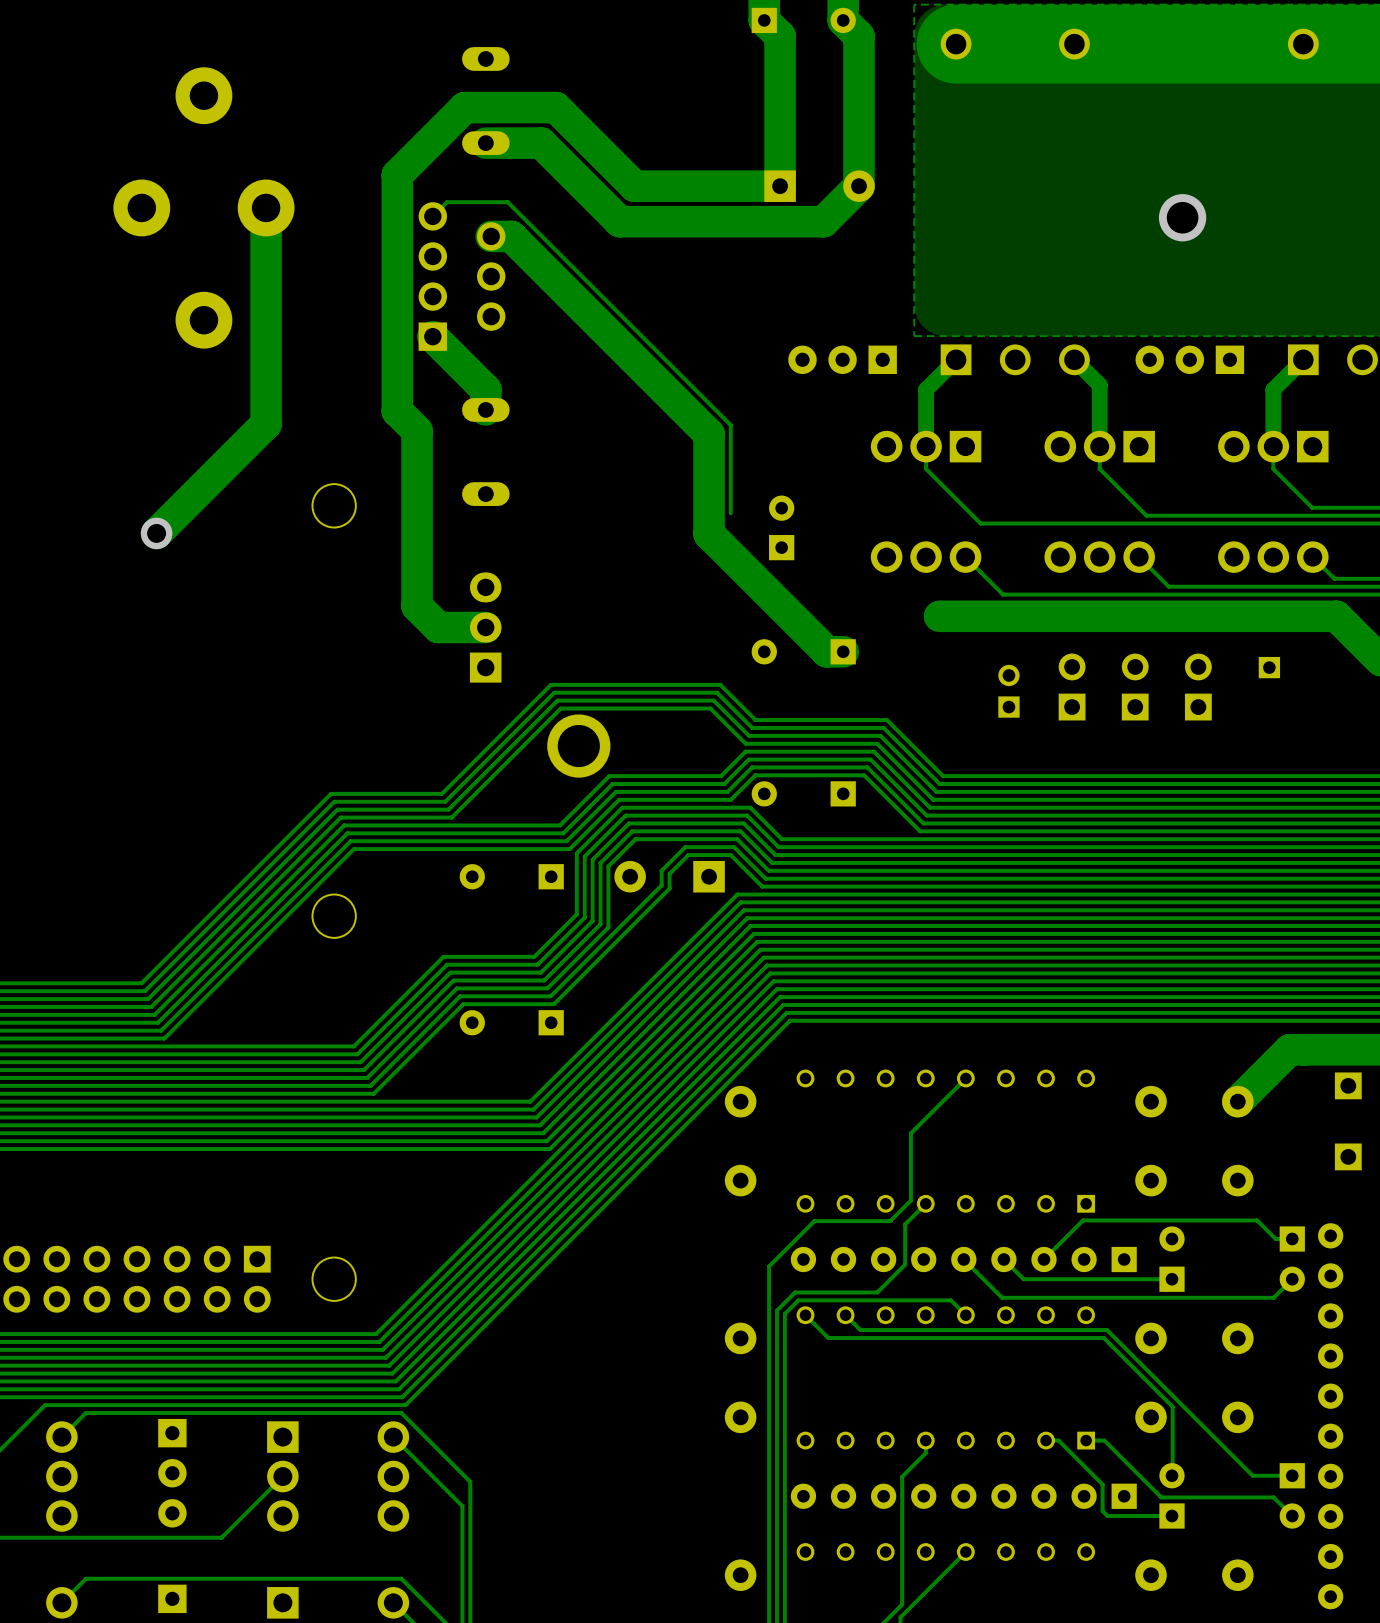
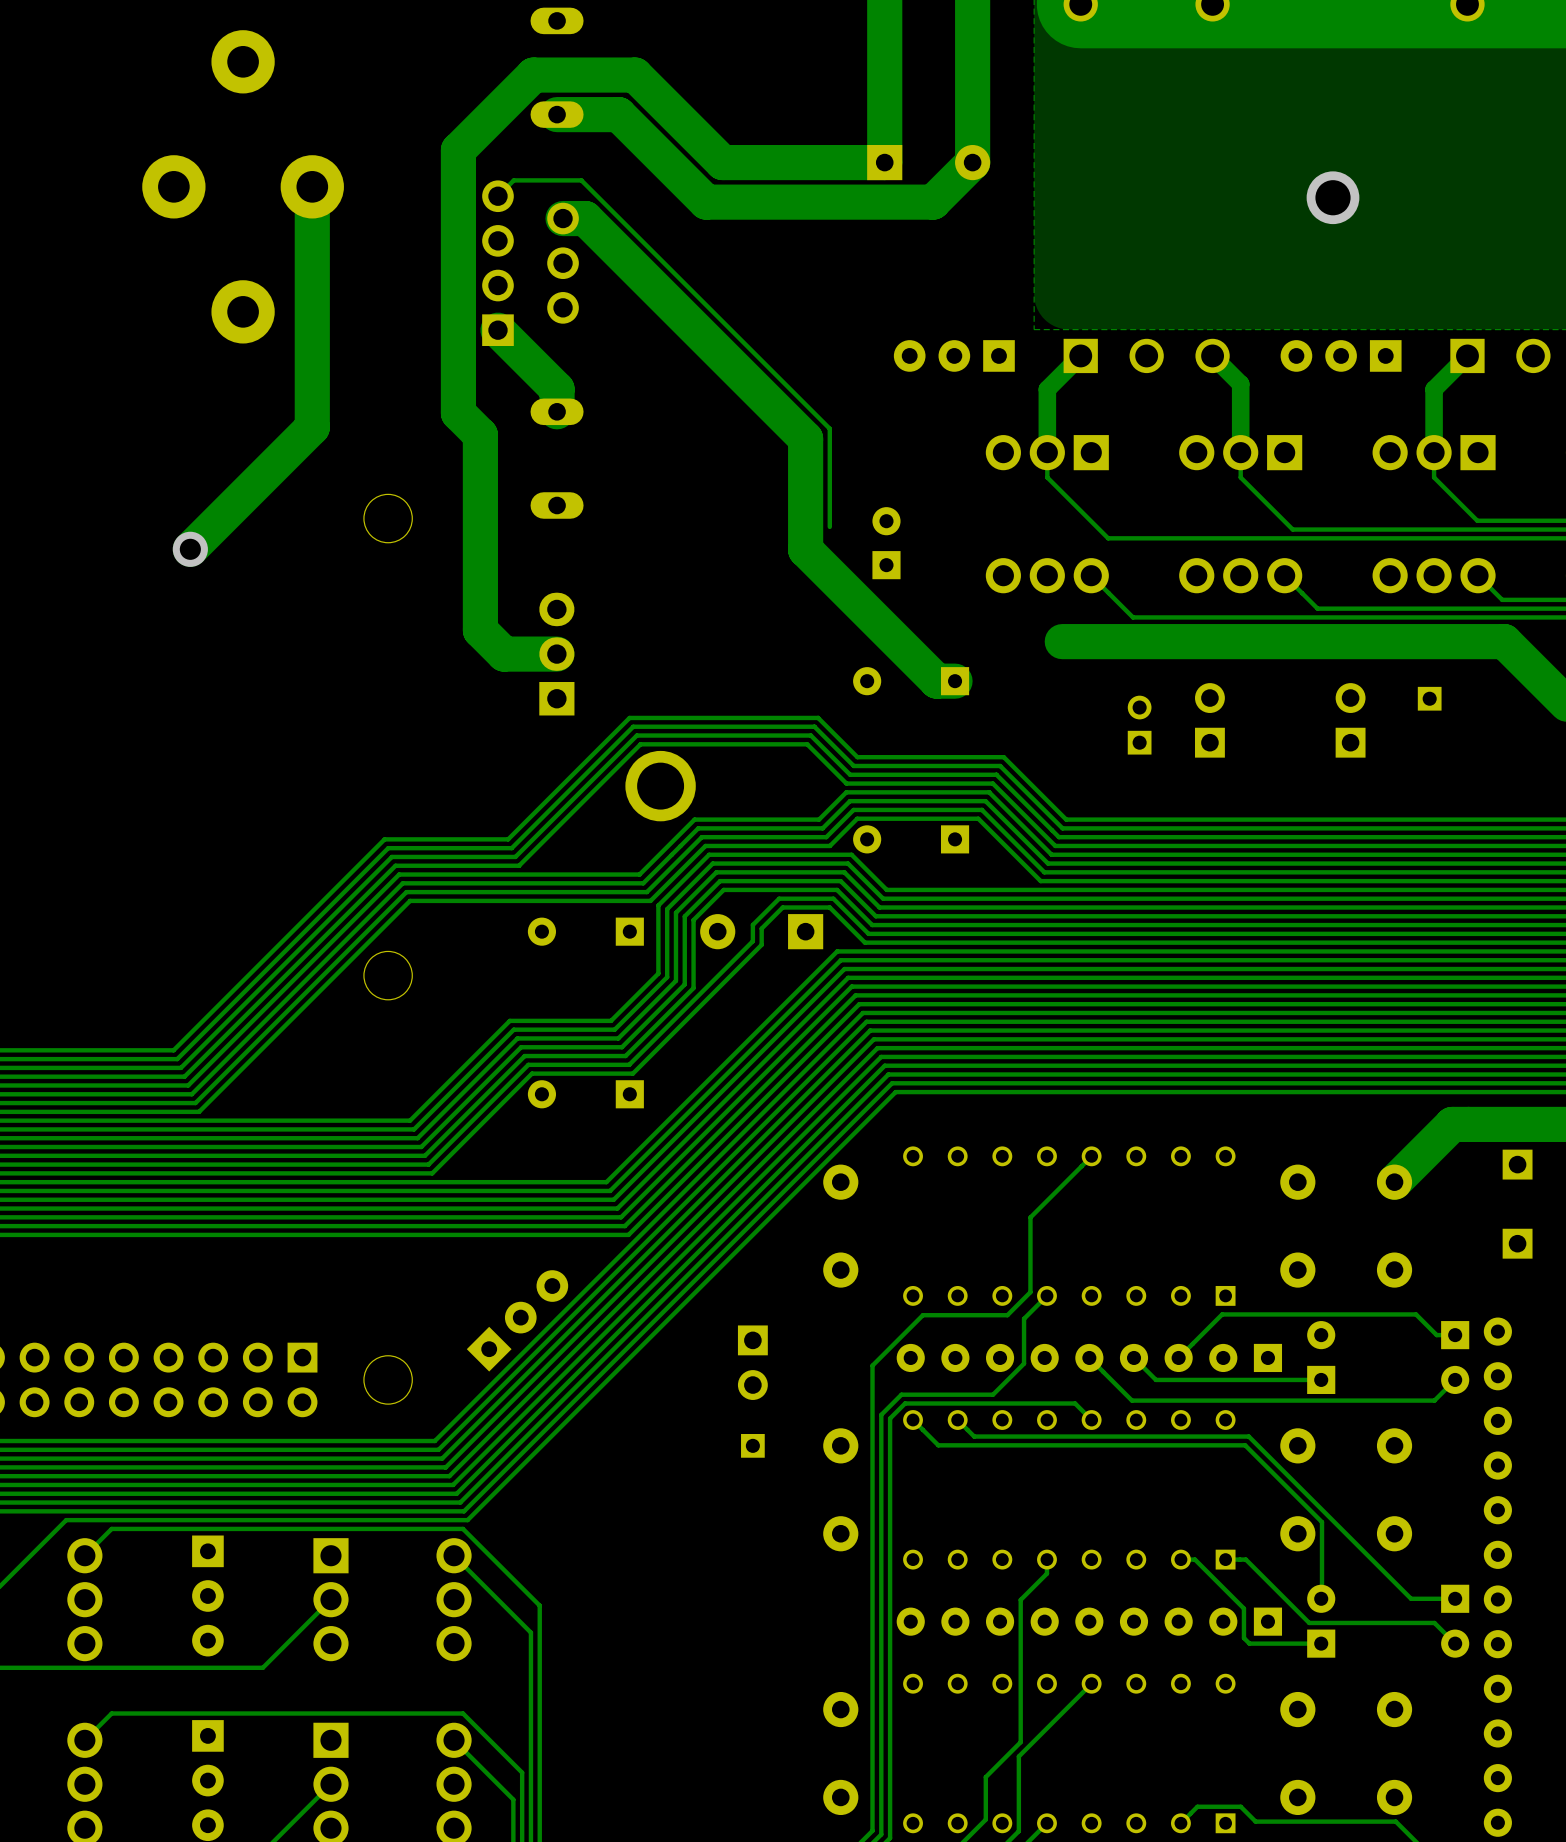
part: (1135, 687) -> none
part: none -> (517, 1320)
part: none -> (752, 1362)
part: none -> (752, 1445)

